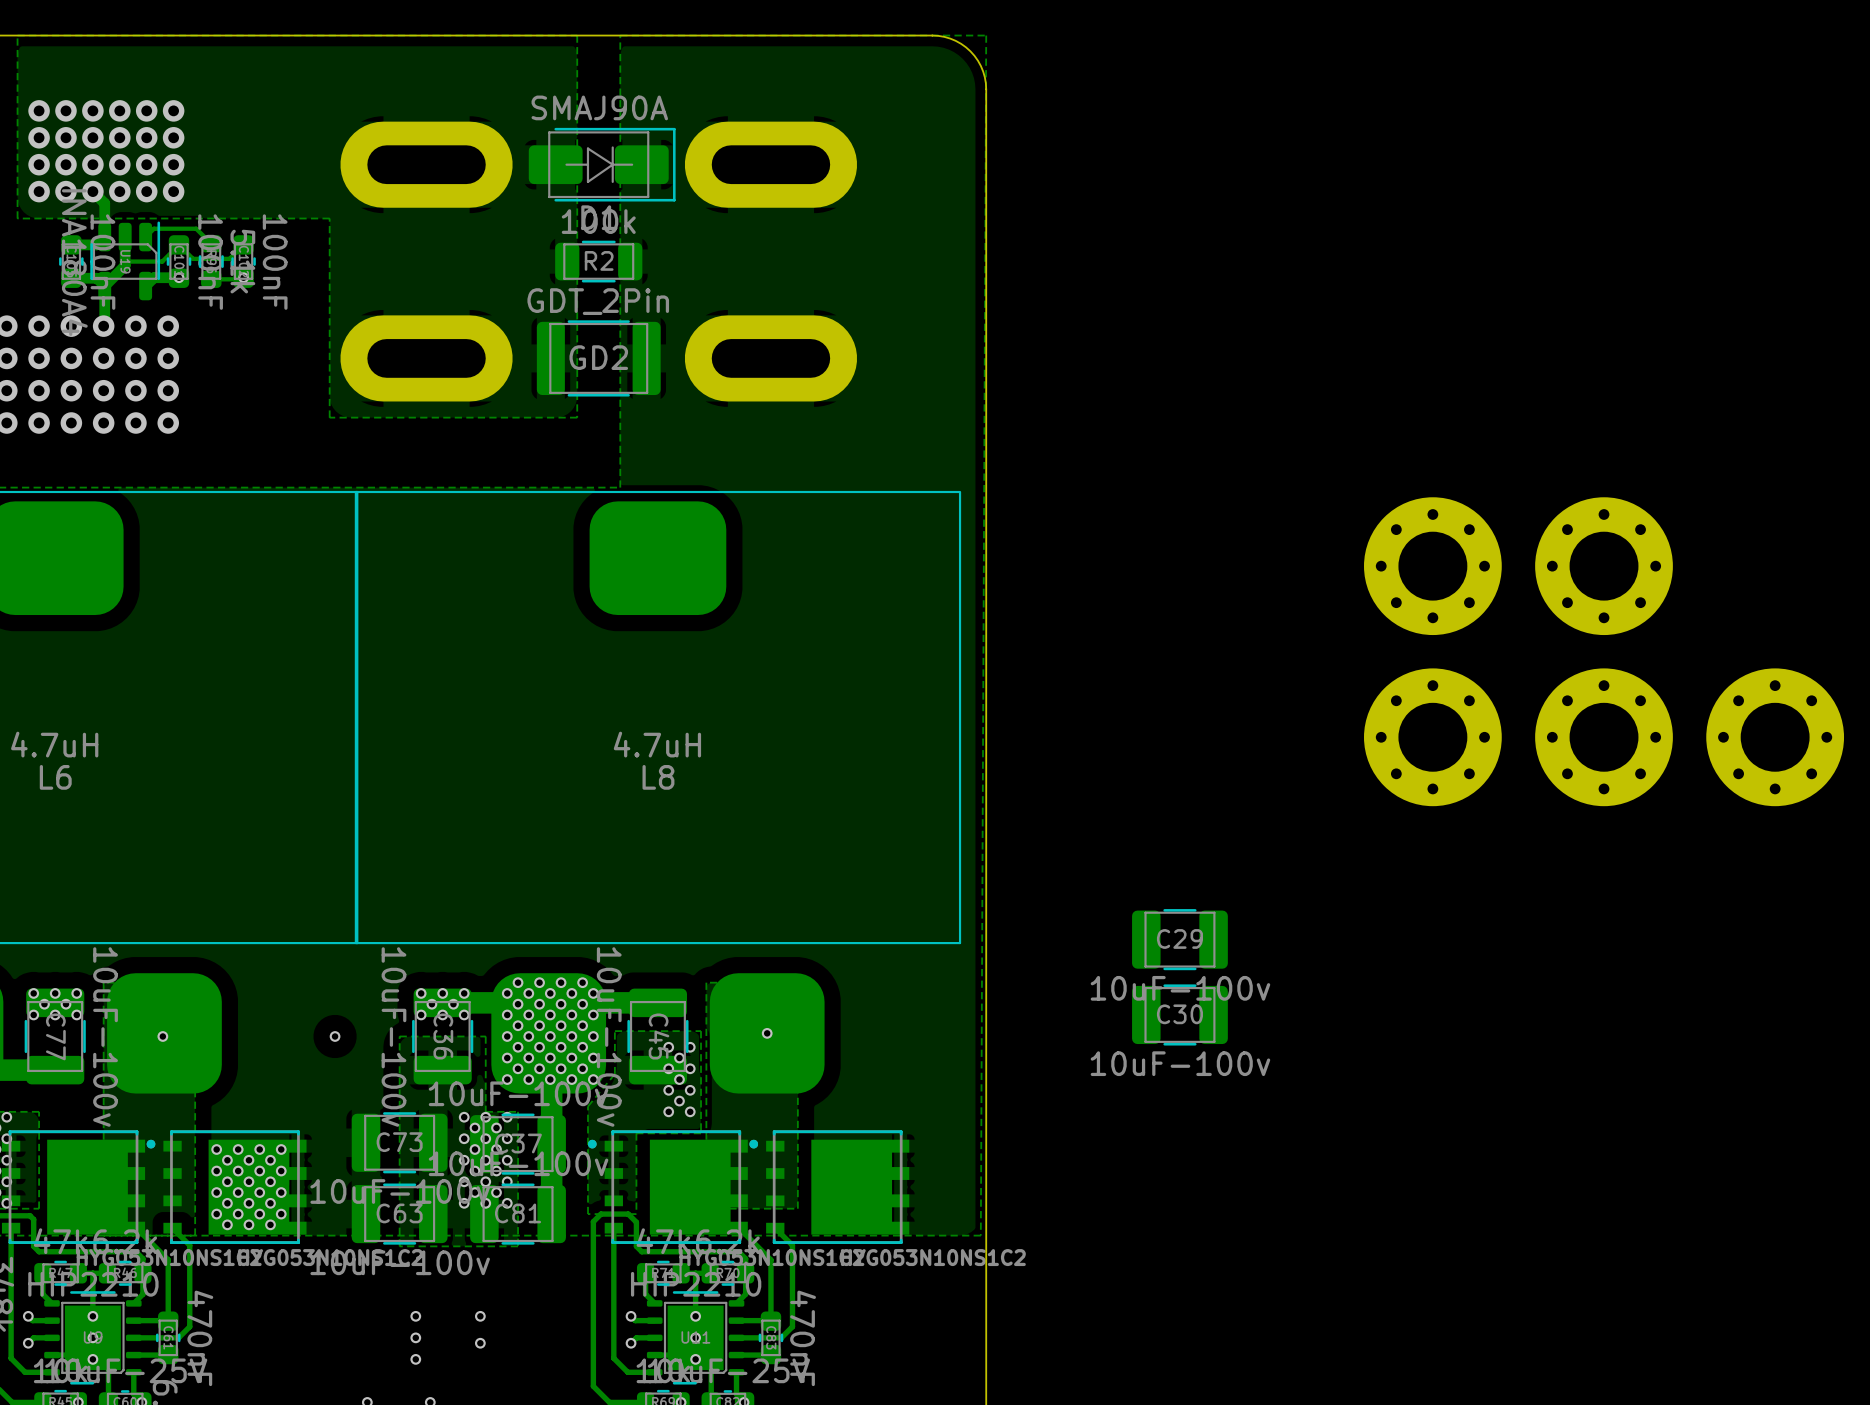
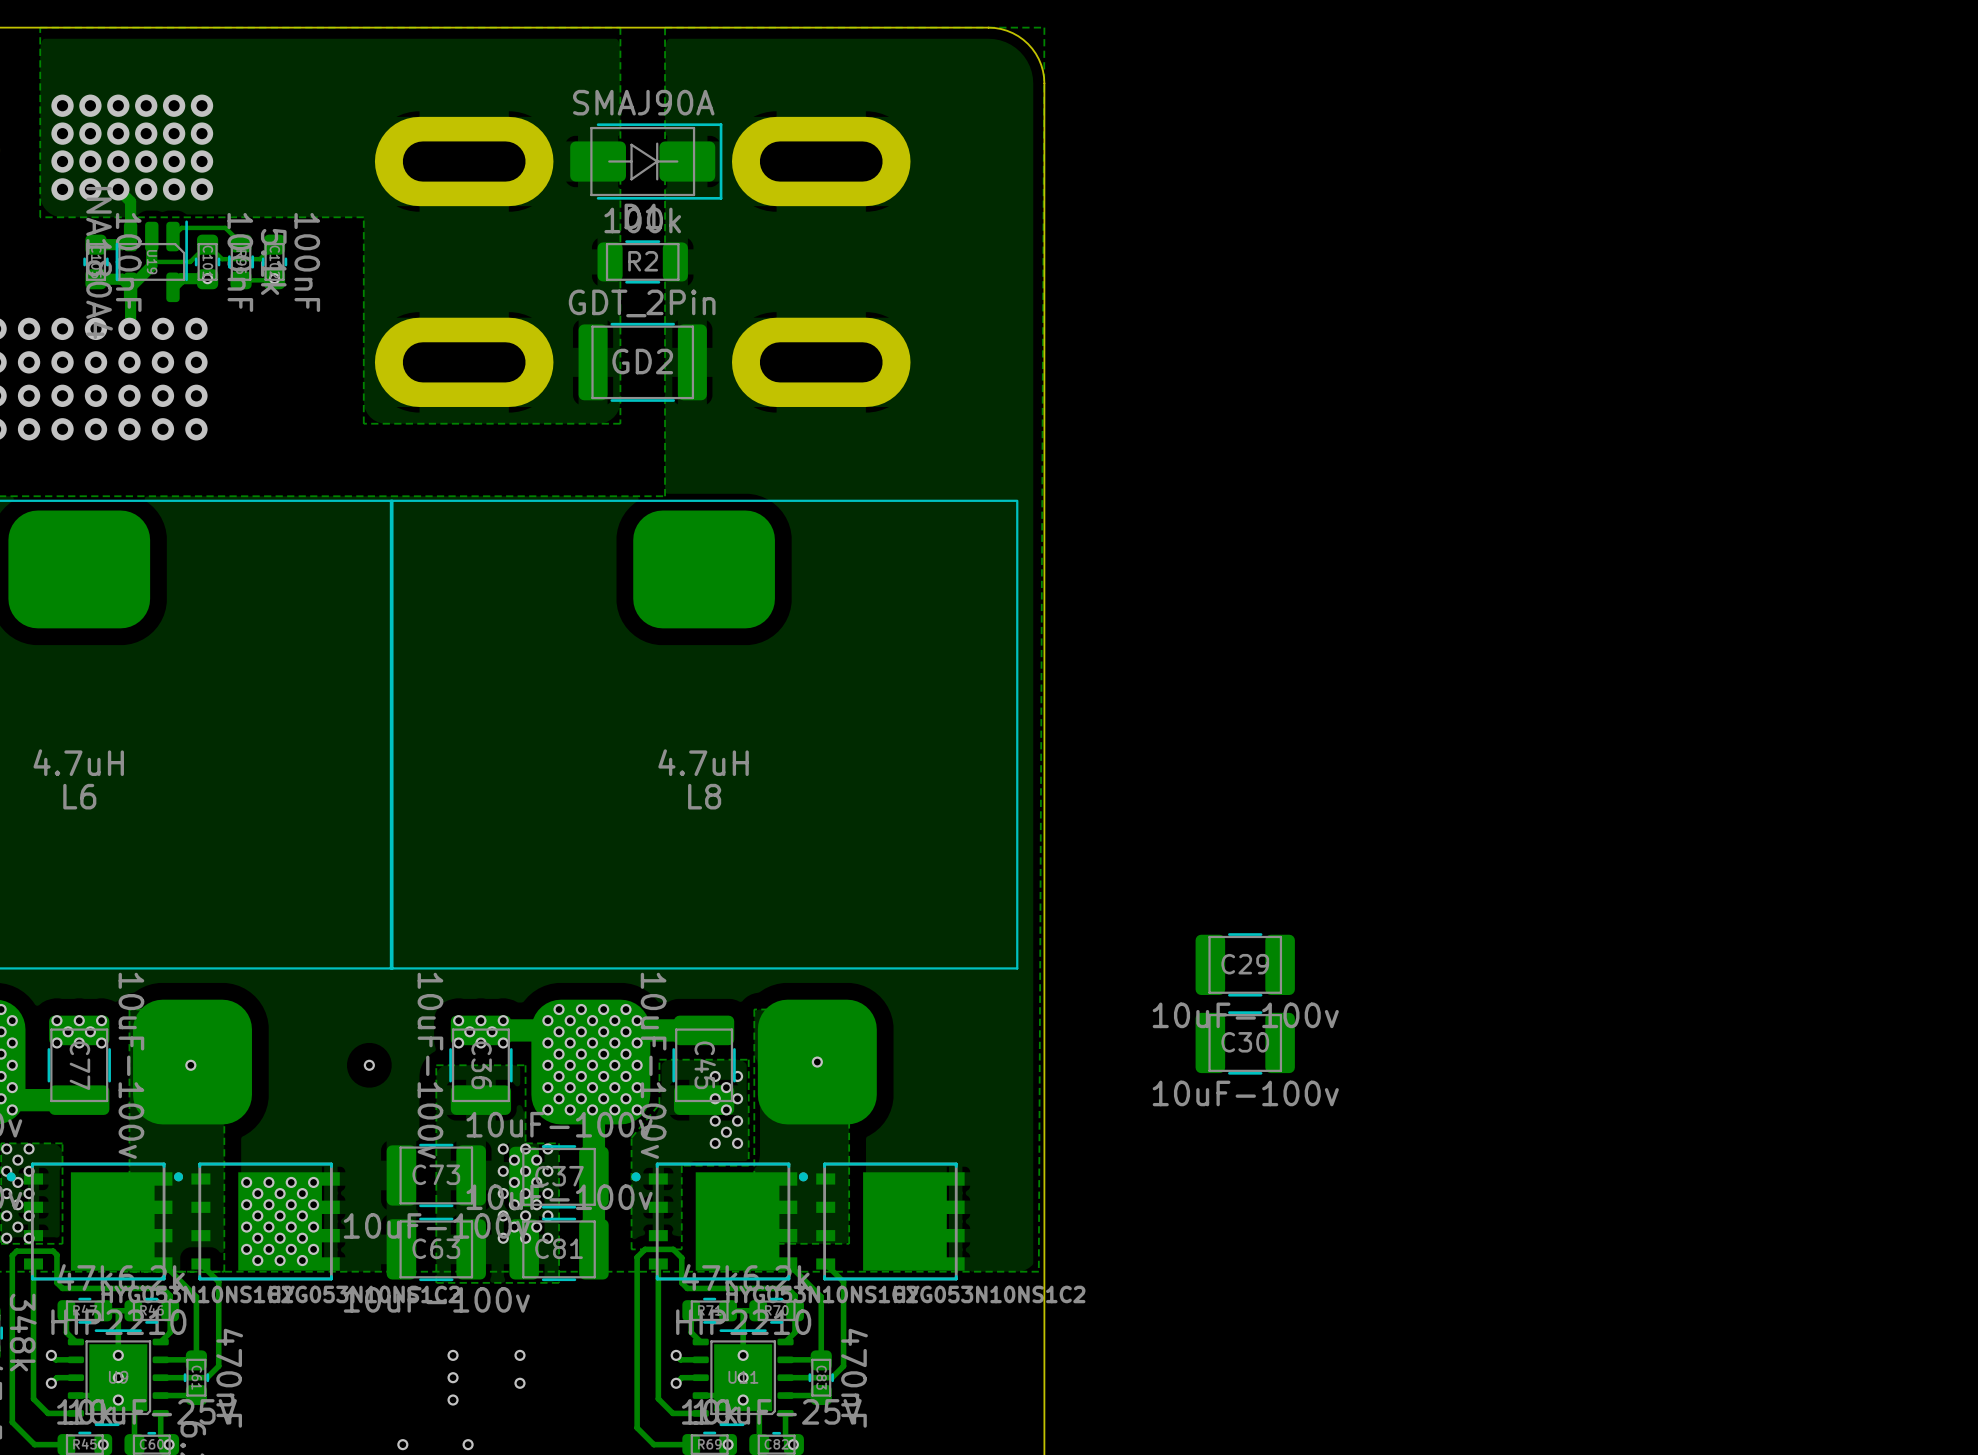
part: (1432, 566) -> none
part: (1604, 566) -> none
part: (1432, 737) -> none
part: (1604, 737) -> none
part: (1775, 737) -> none

